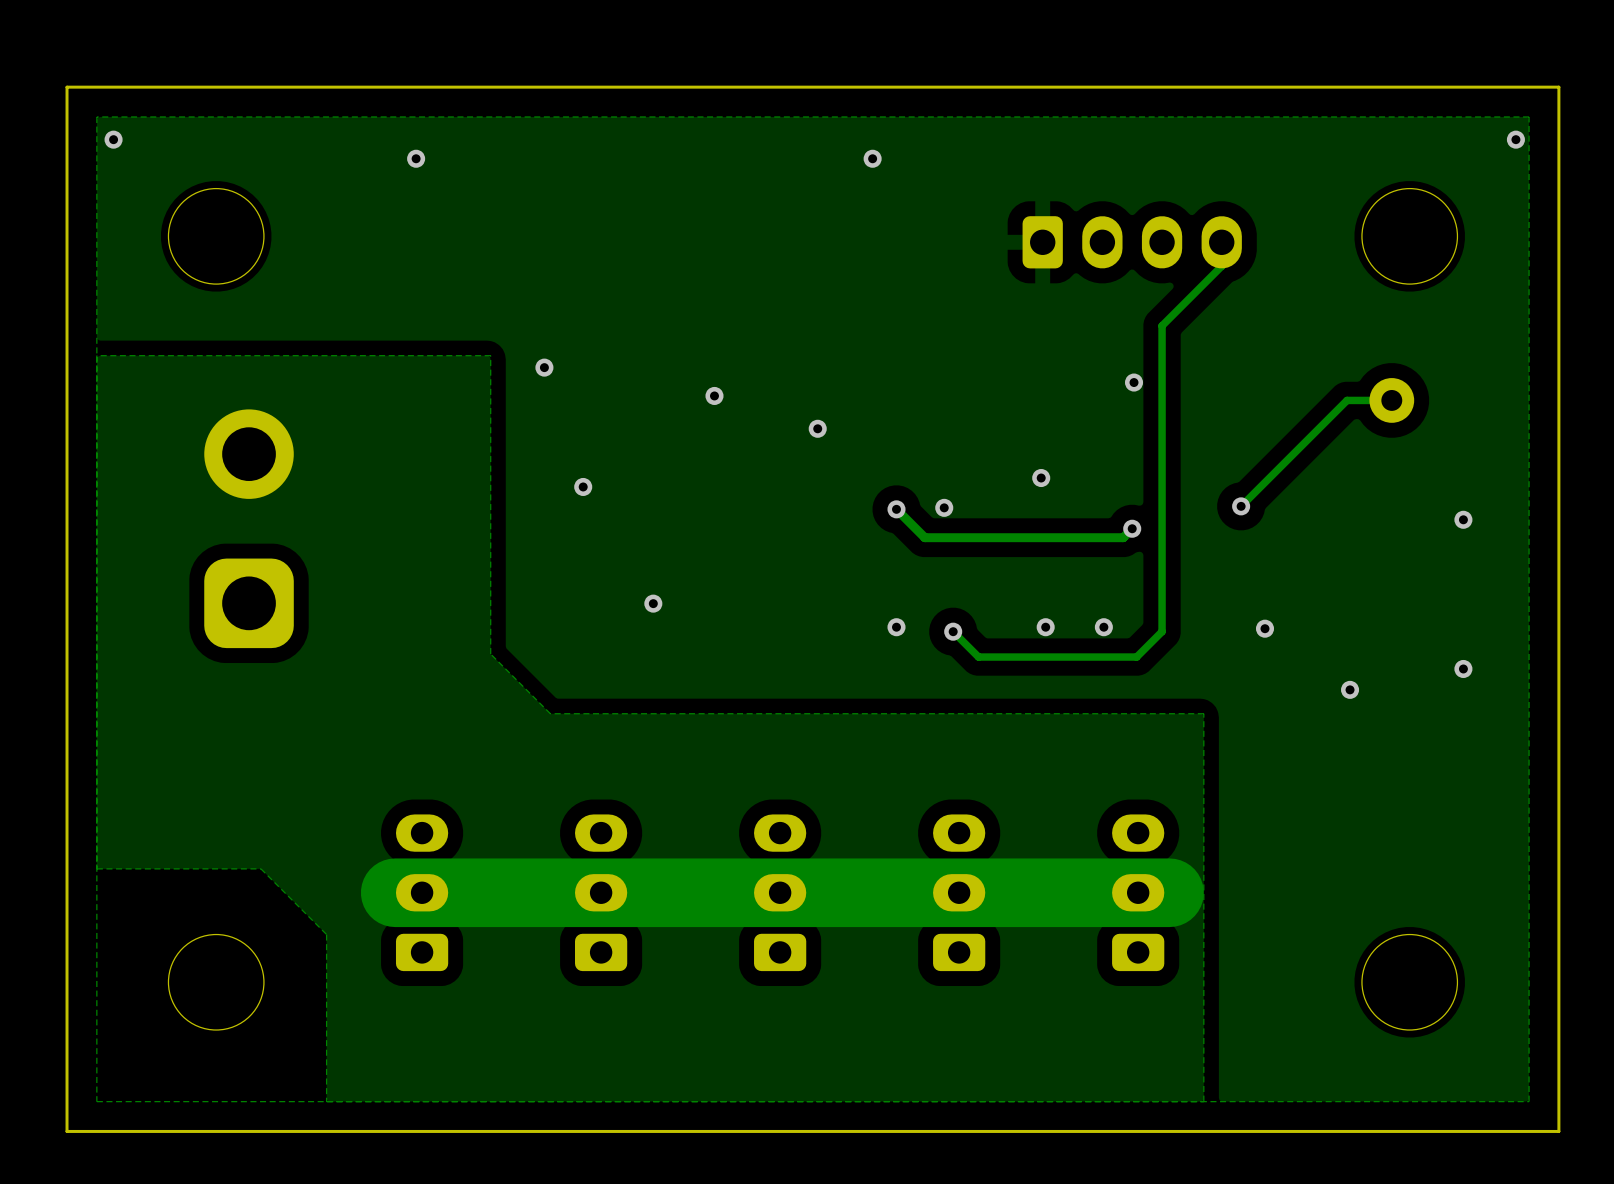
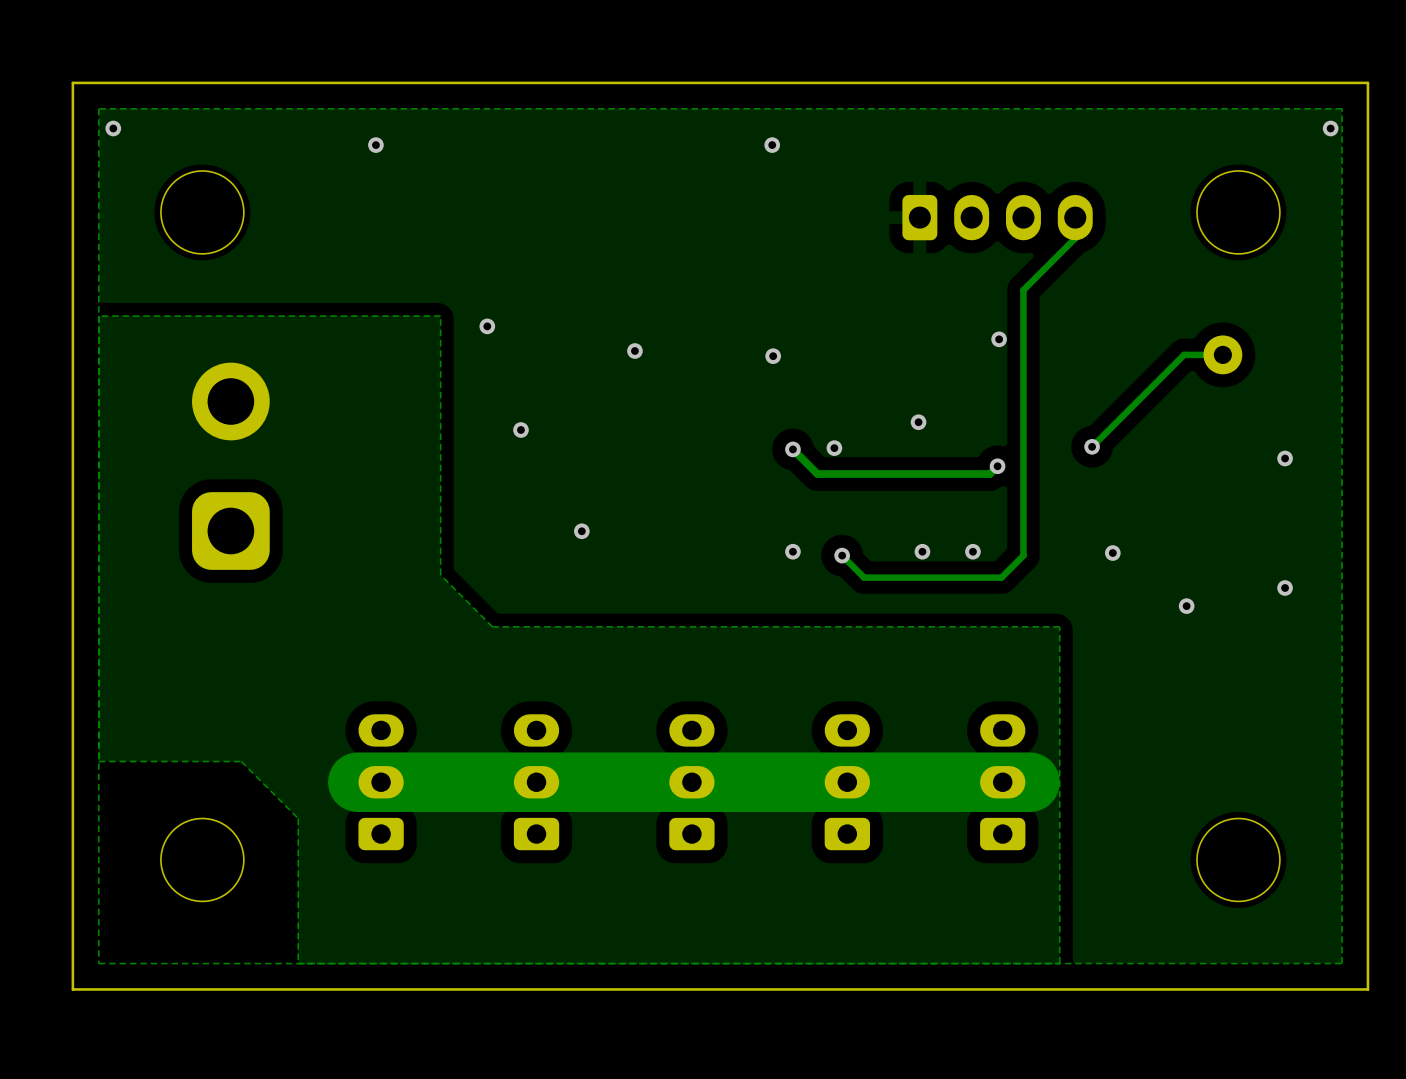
via position: (817, 428) -> (773, 356)

